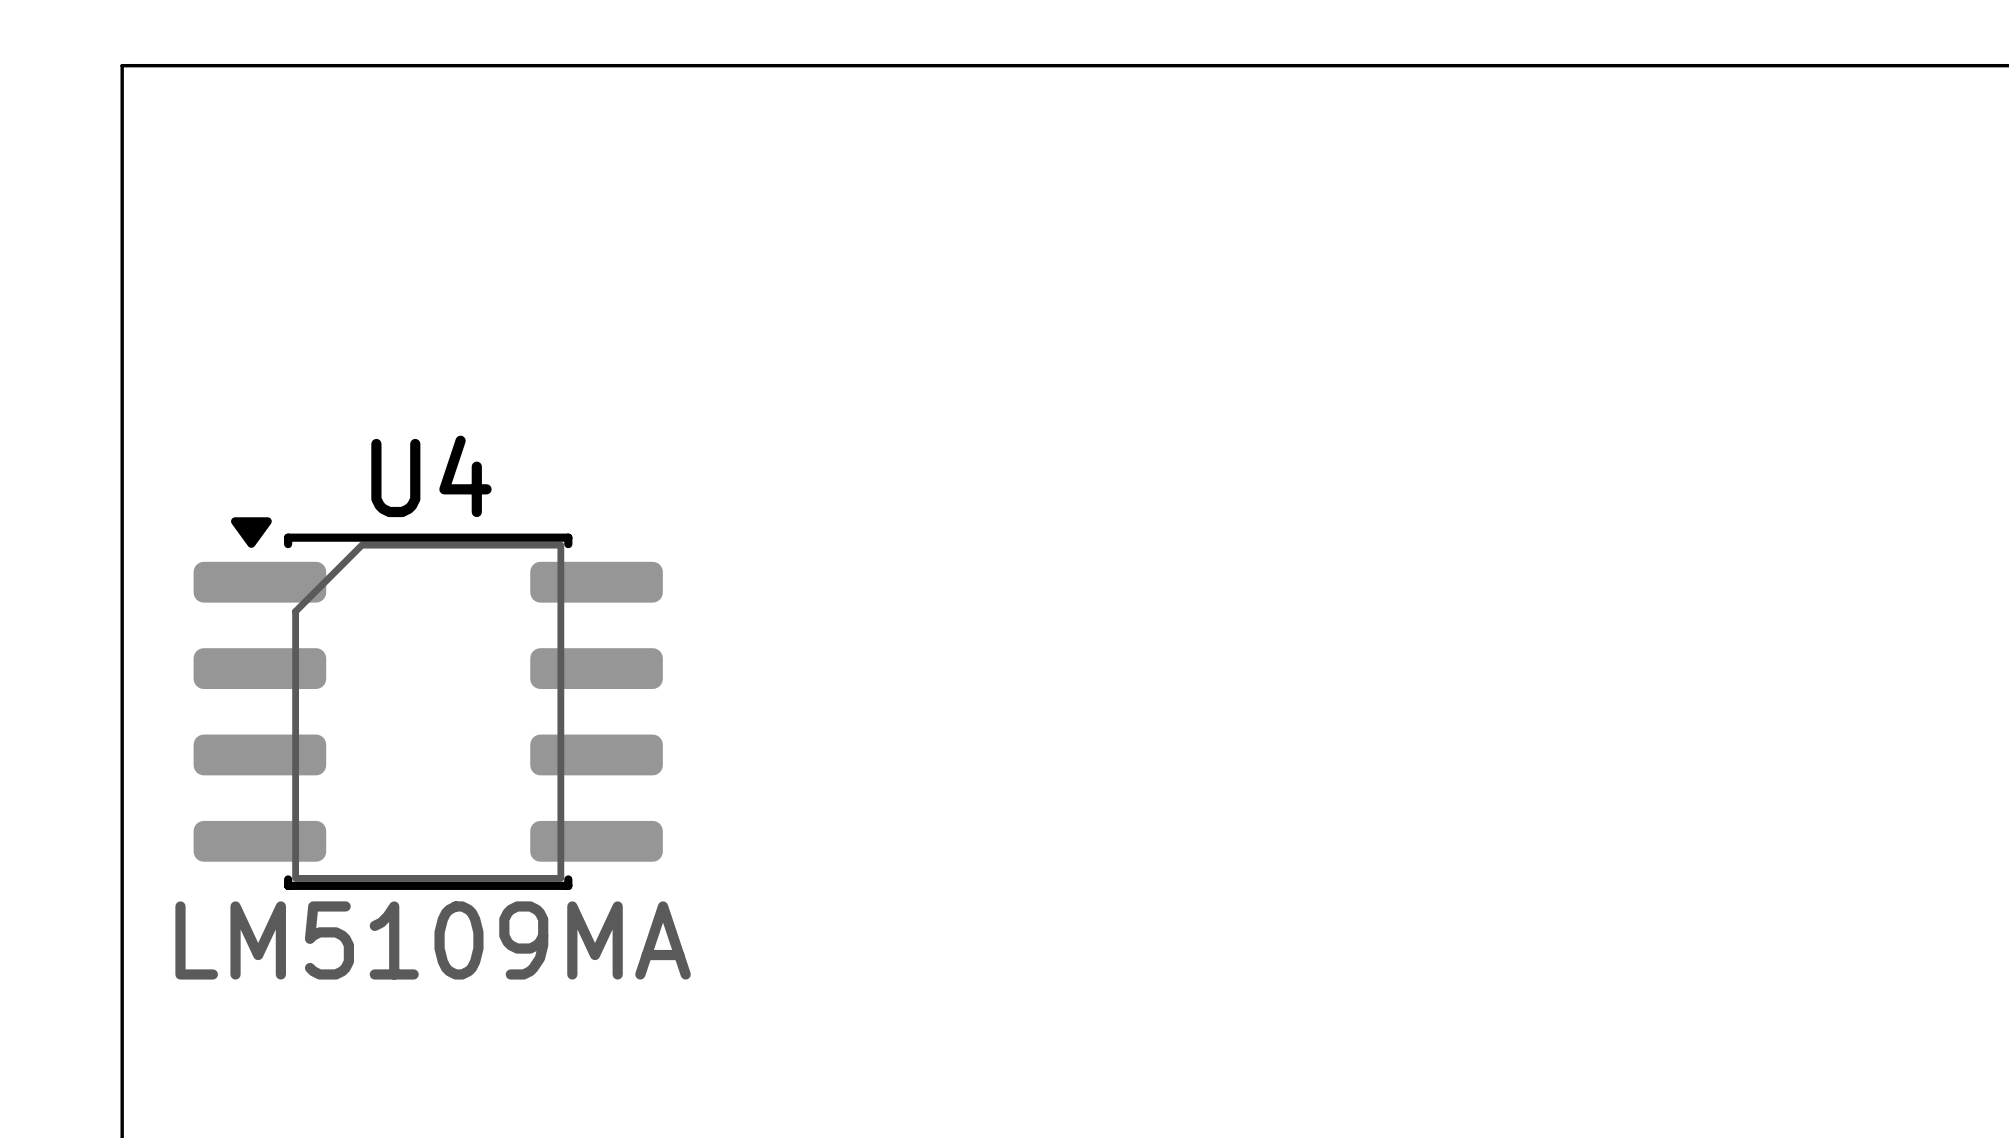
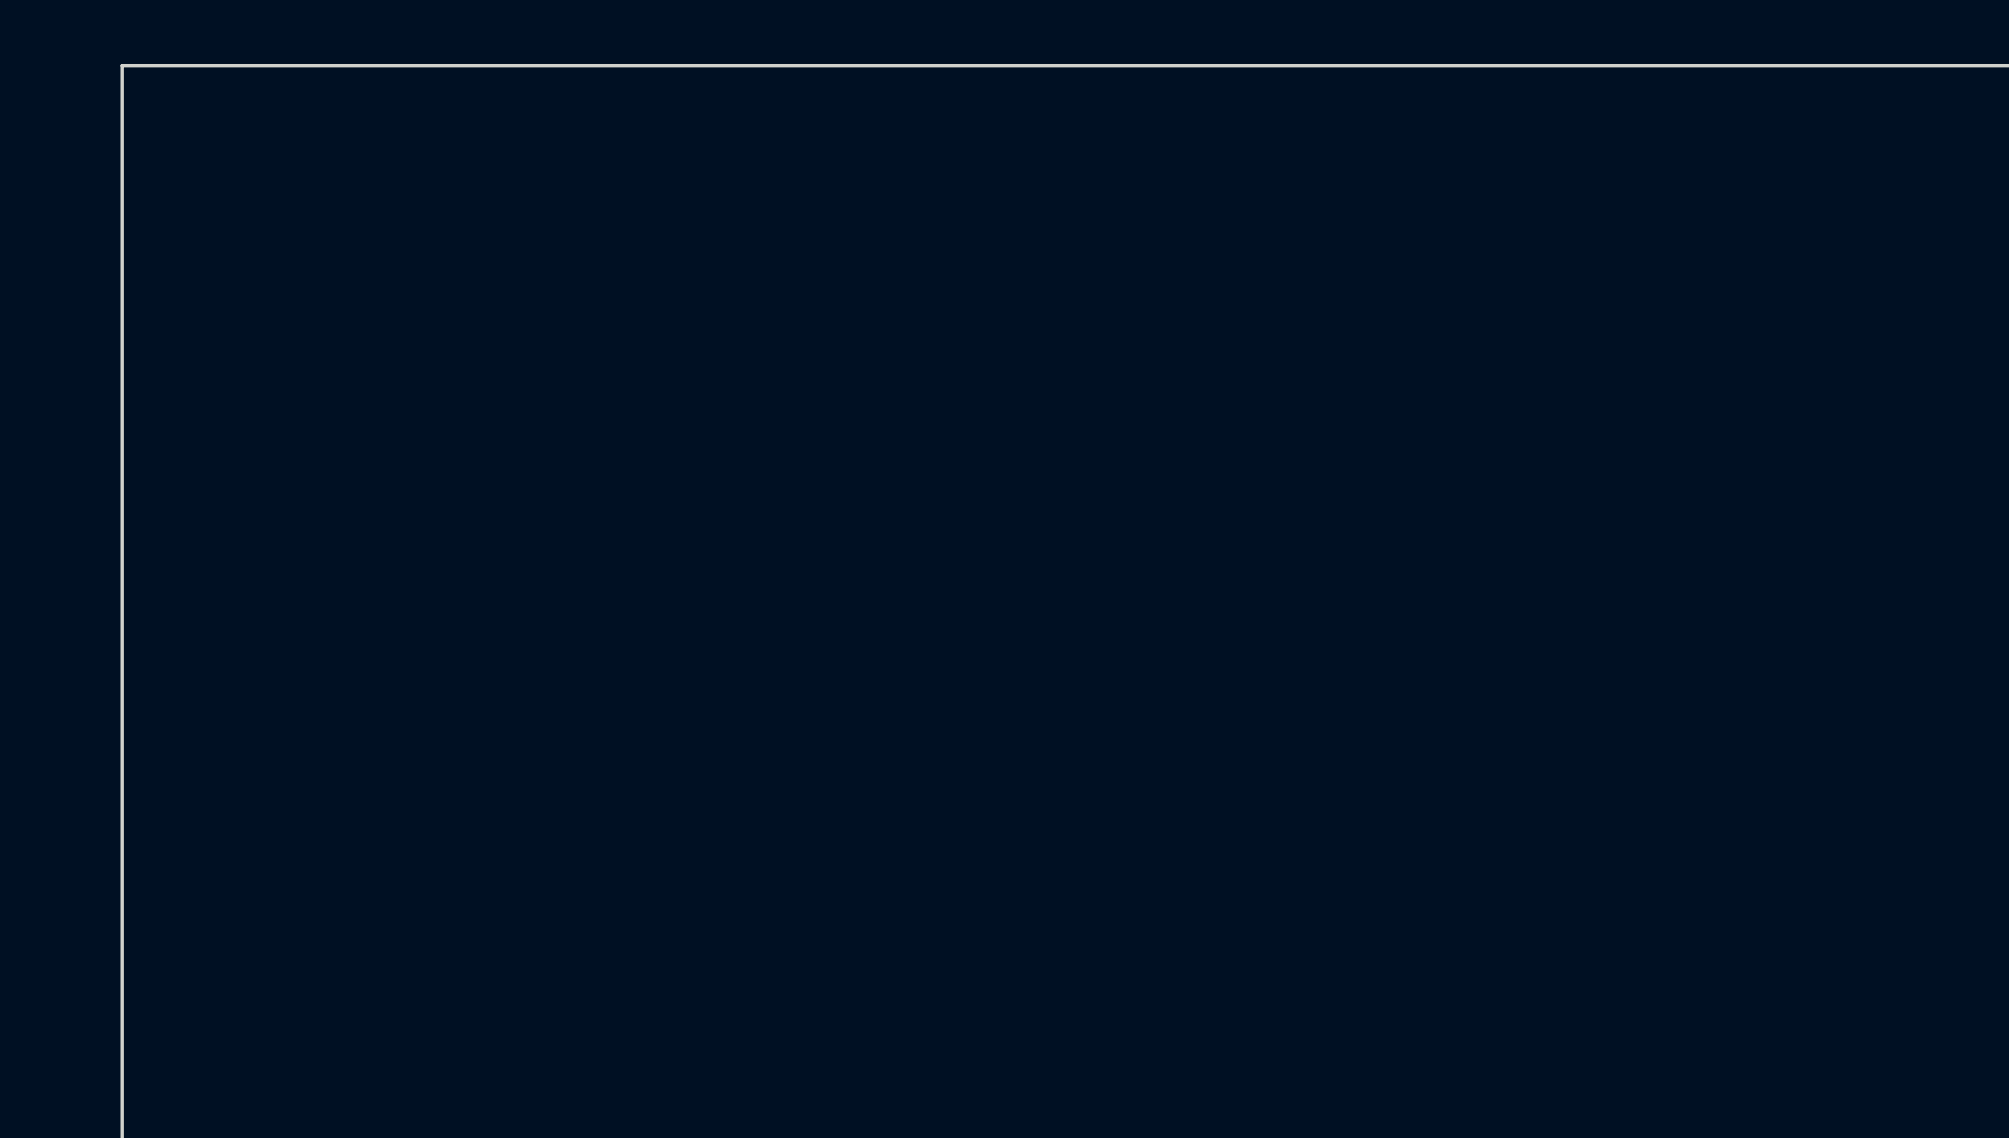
U4: LM5109MA (428, 703) -> none

